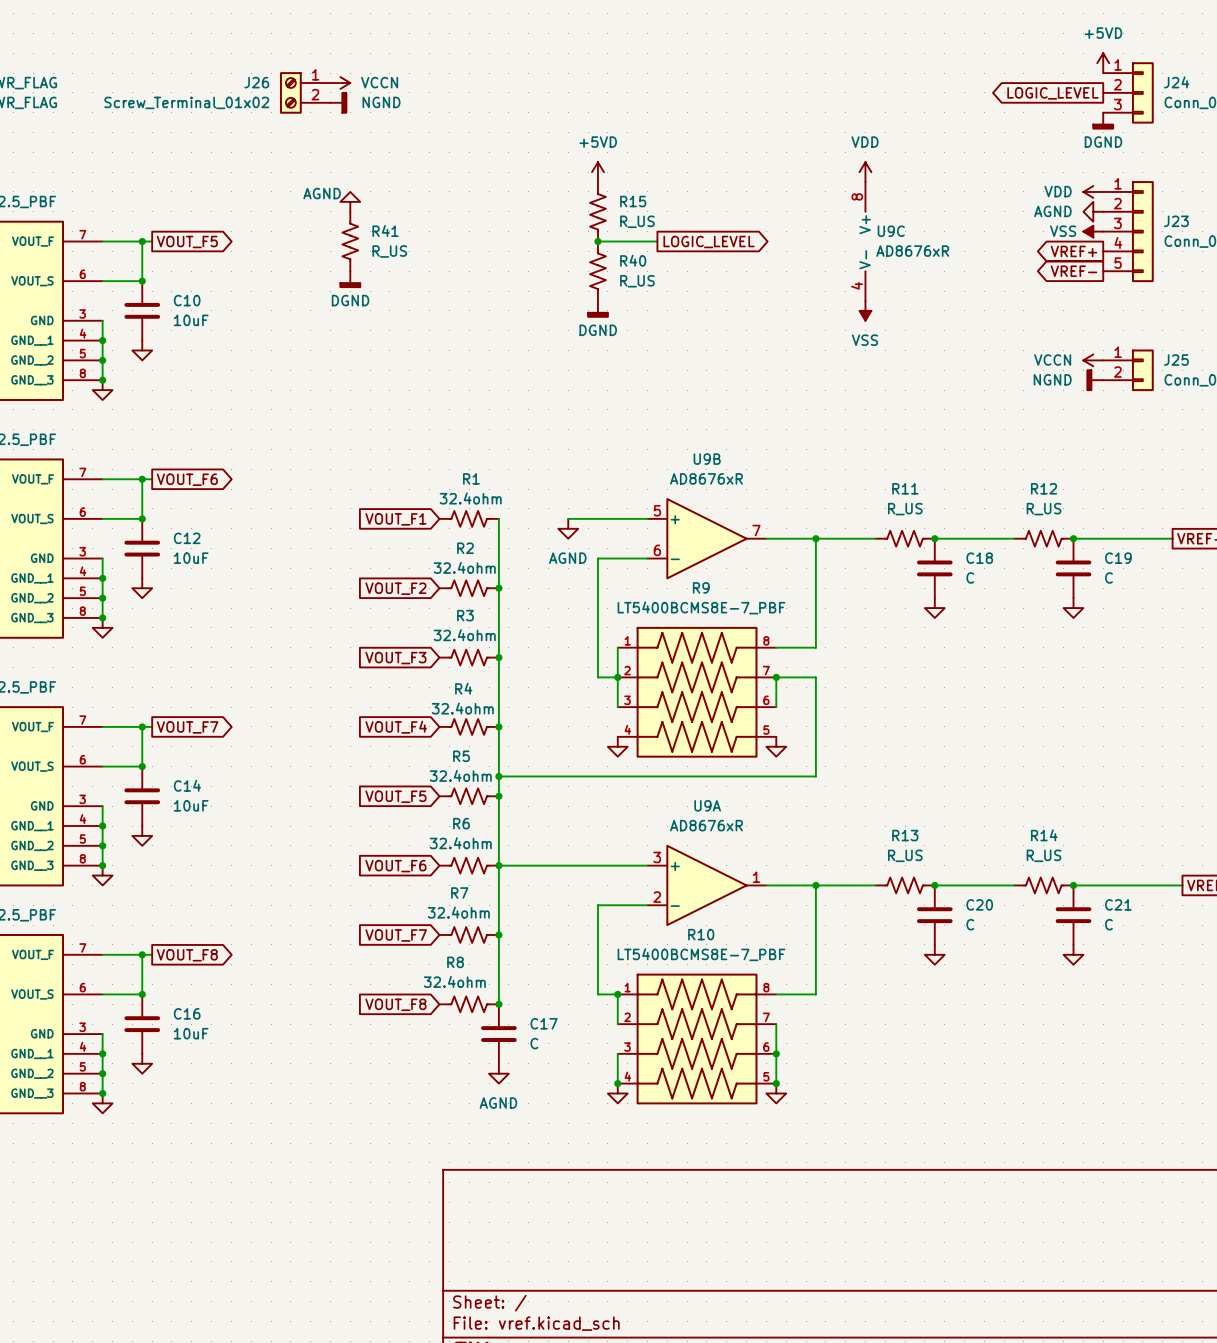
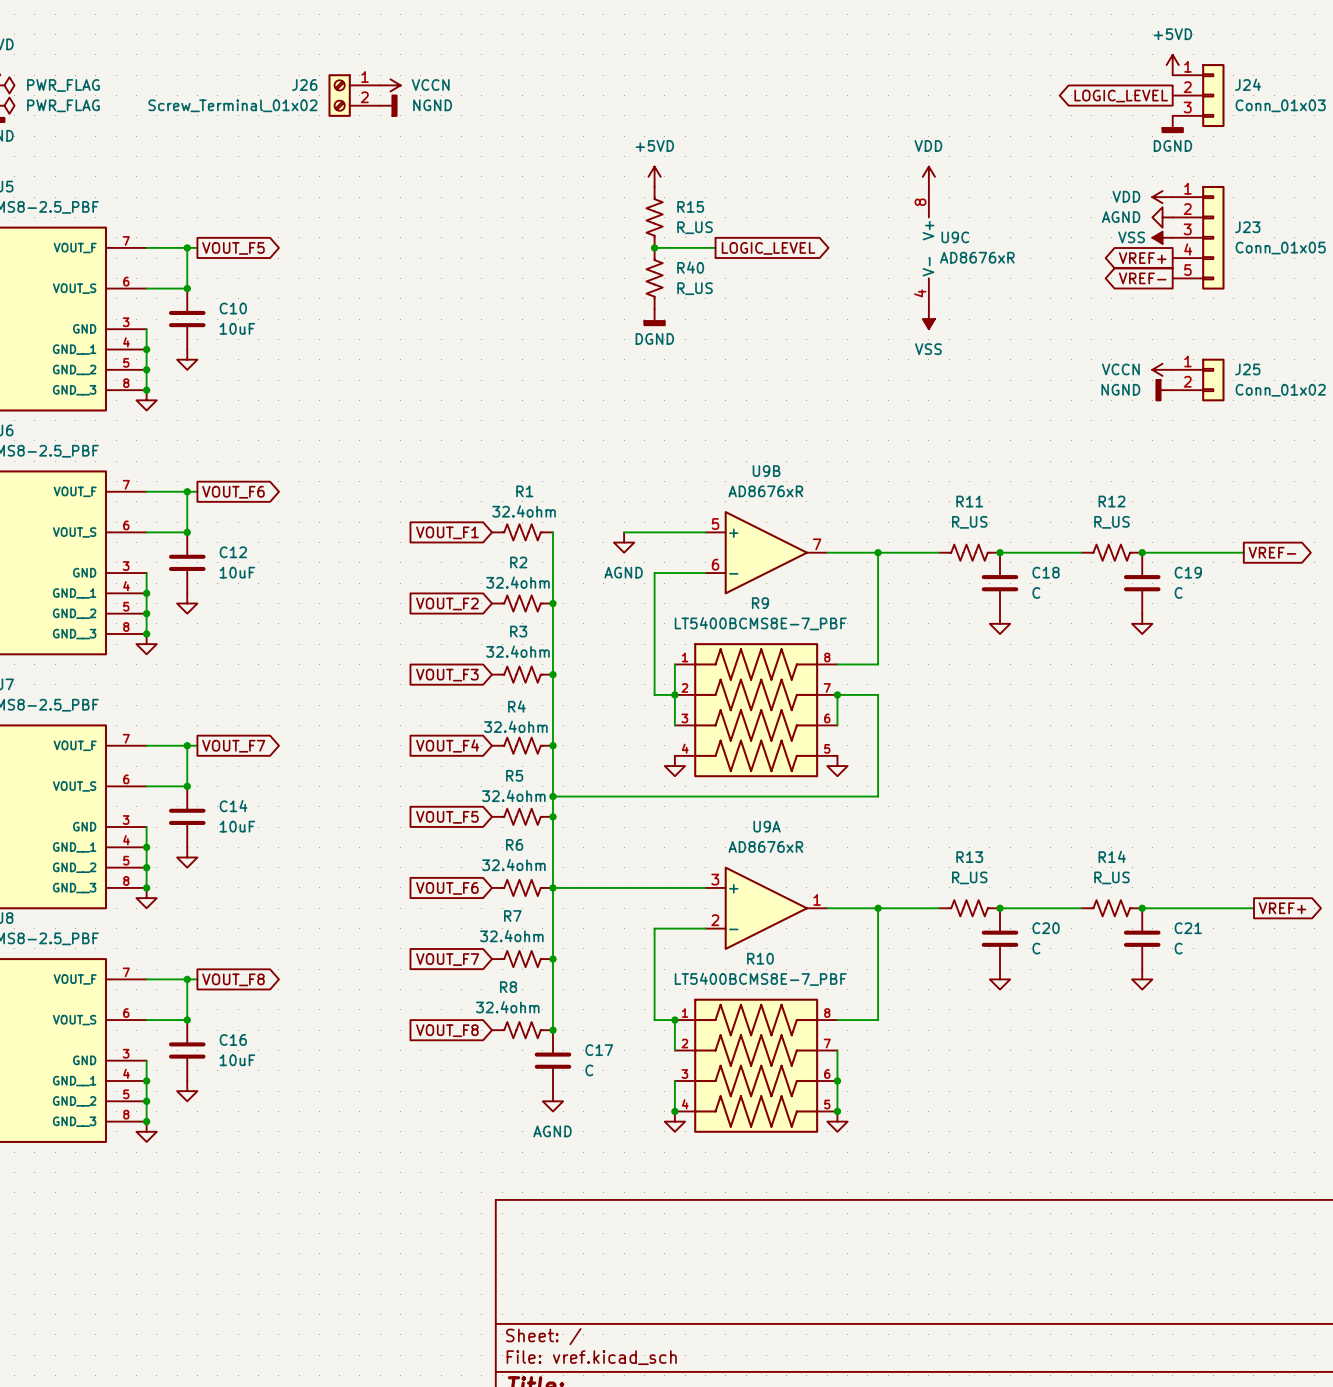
power symbol: AGND (350, 201) -> none
R41: R_US (350, 241) -> none
power symbol: DGND (350, 279) -> none

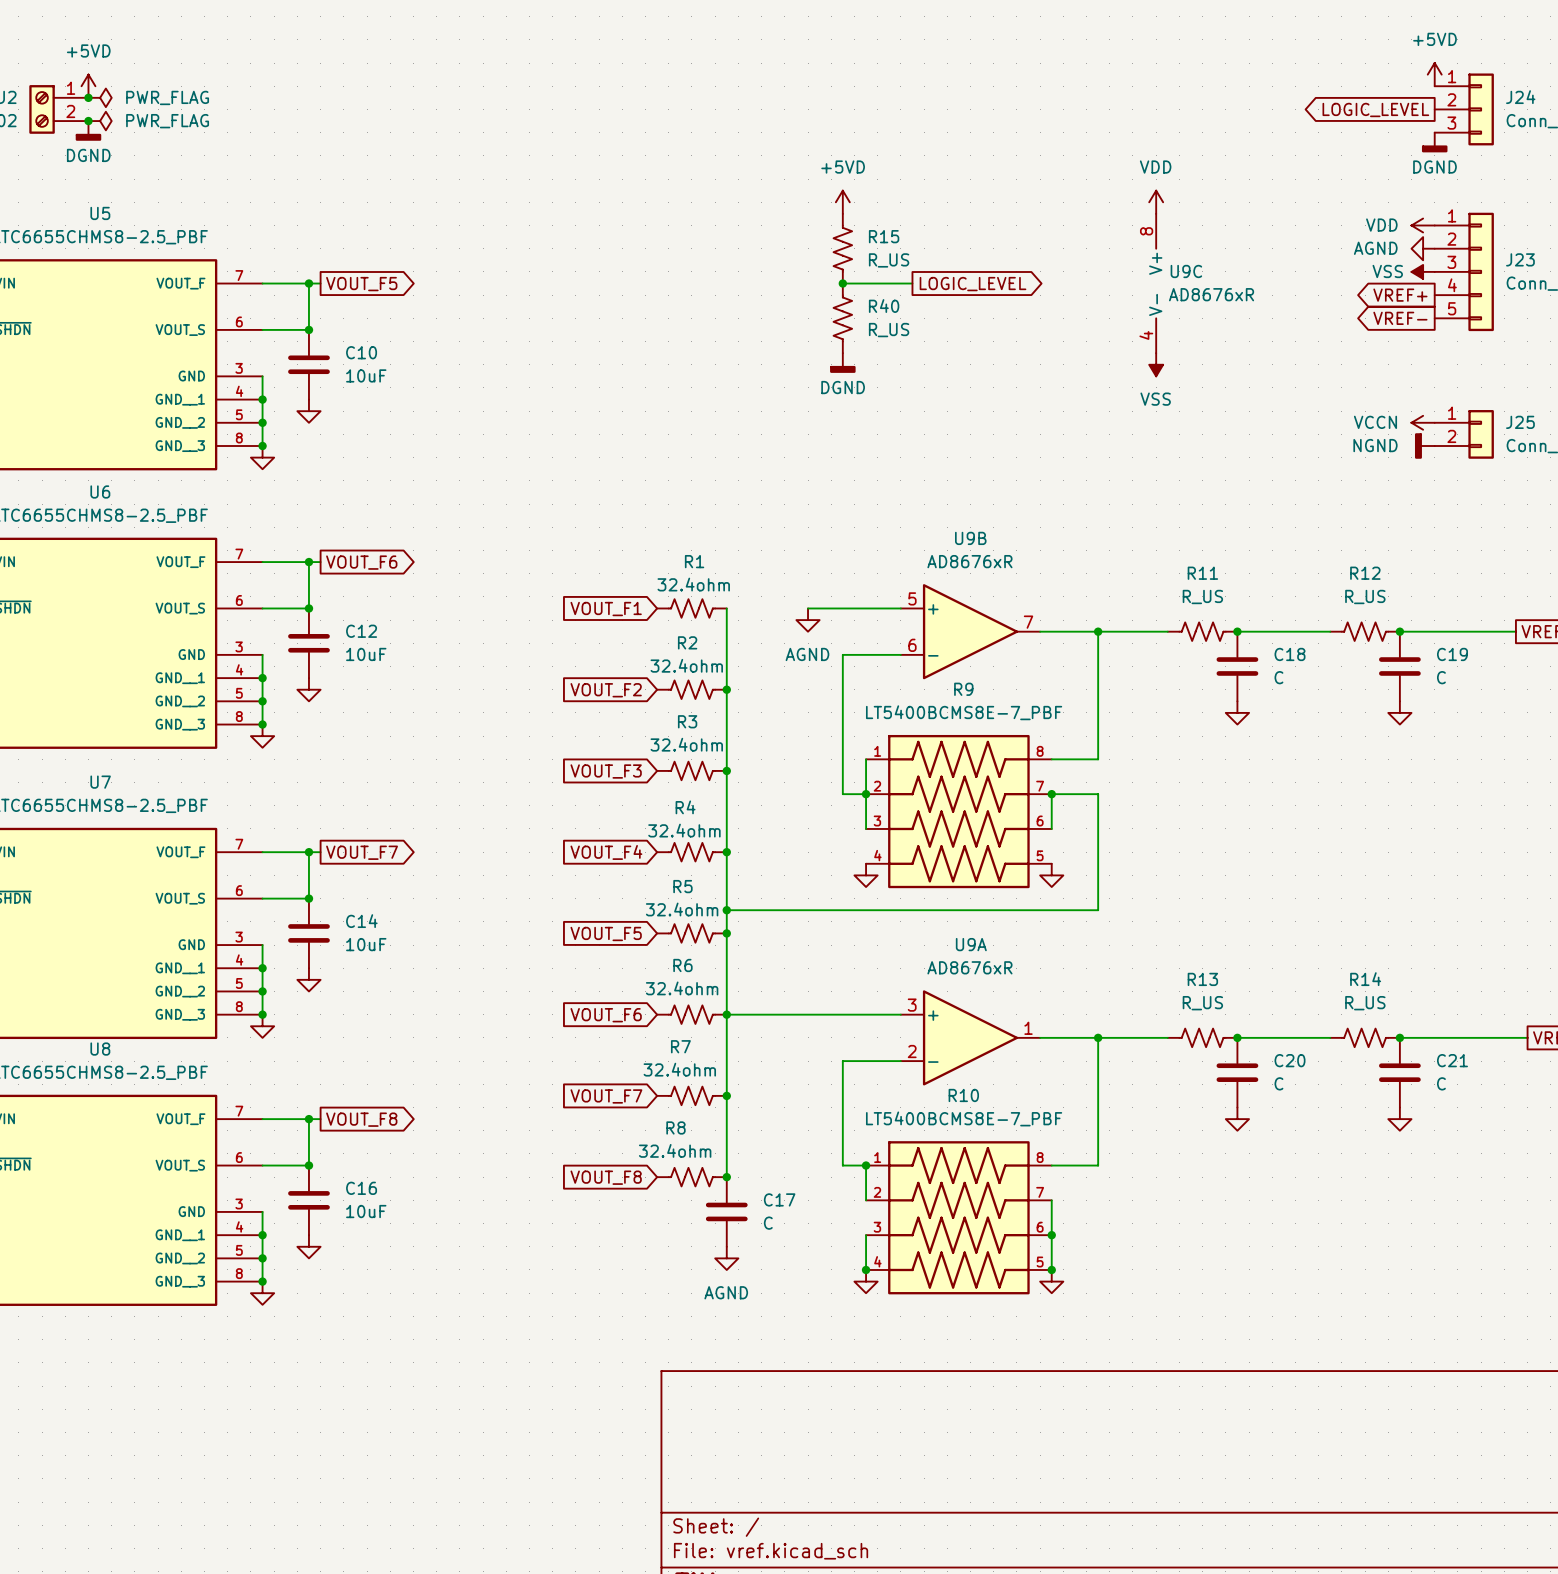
power symbol: VCCN (390, 85) -> none
J26: Screw_Terminal_01x02 (354, 95) -> none
power symbol: NGND (388, 105) -> none

